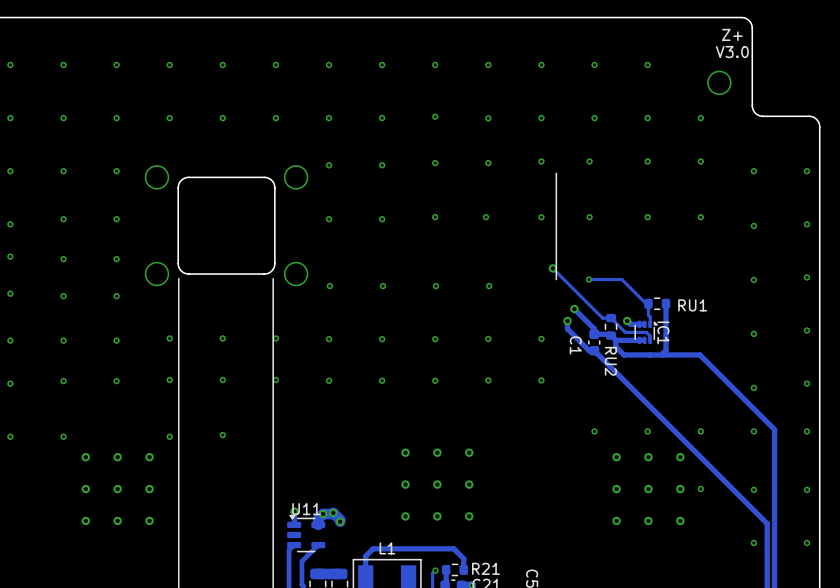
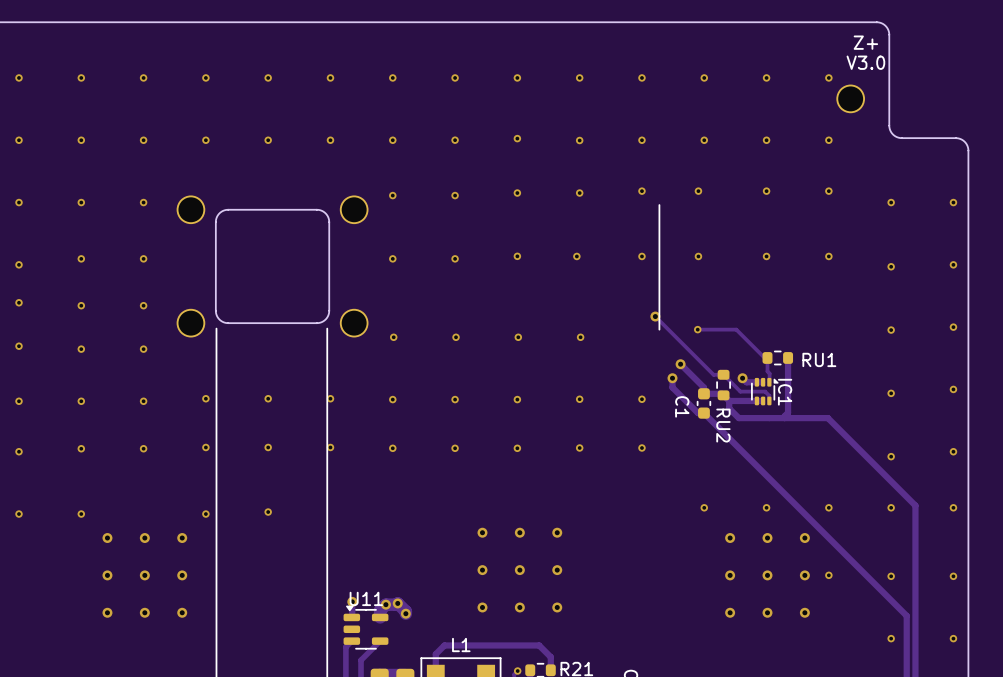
via: none -> (828, 77)

